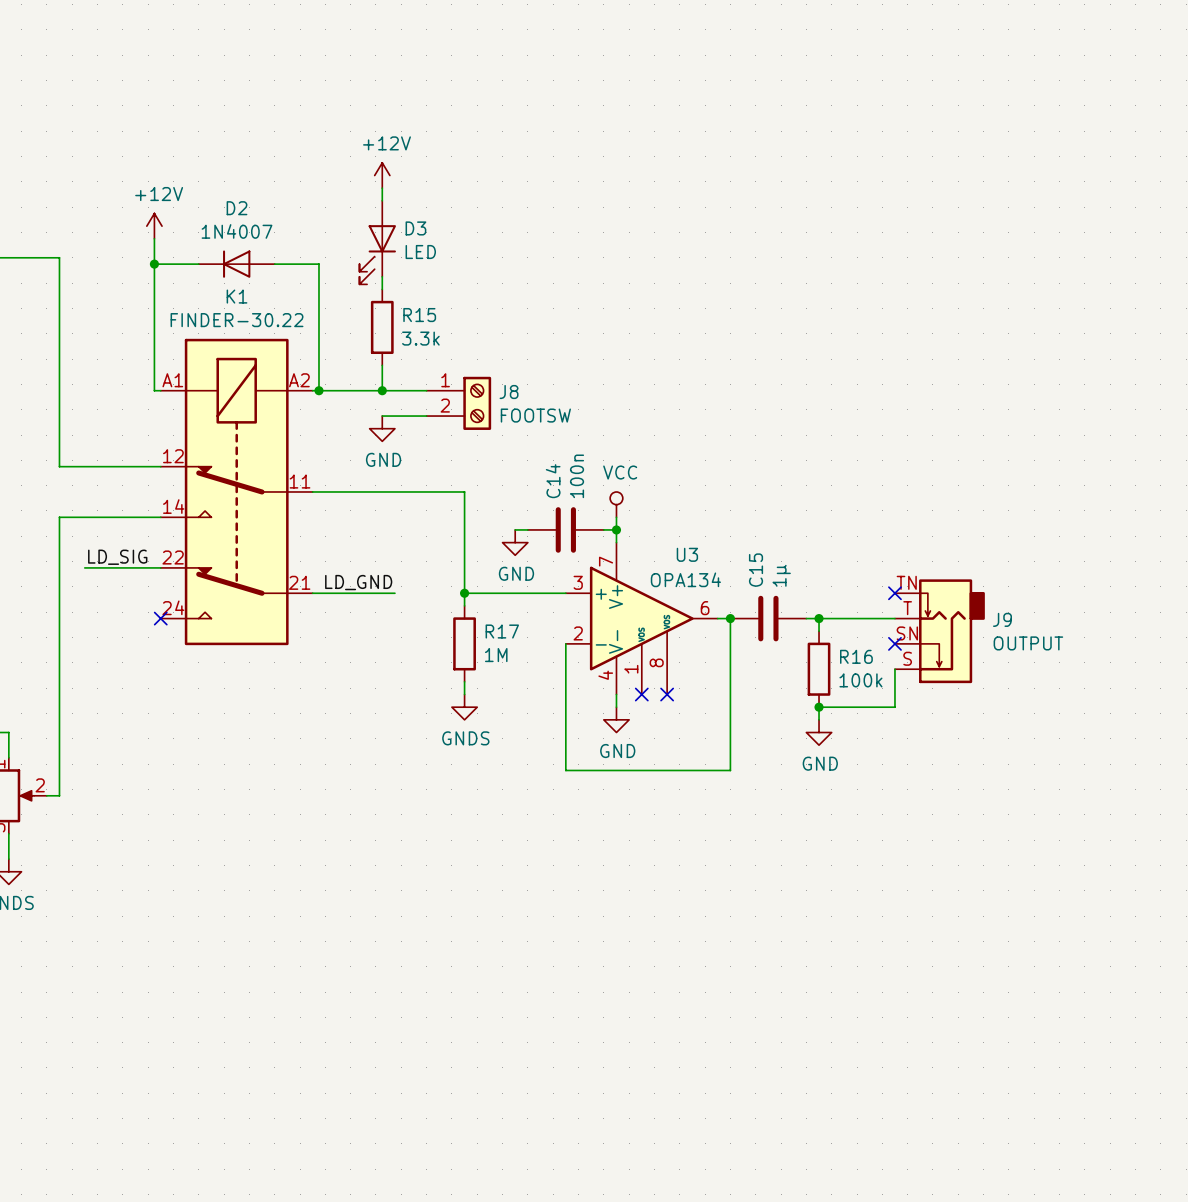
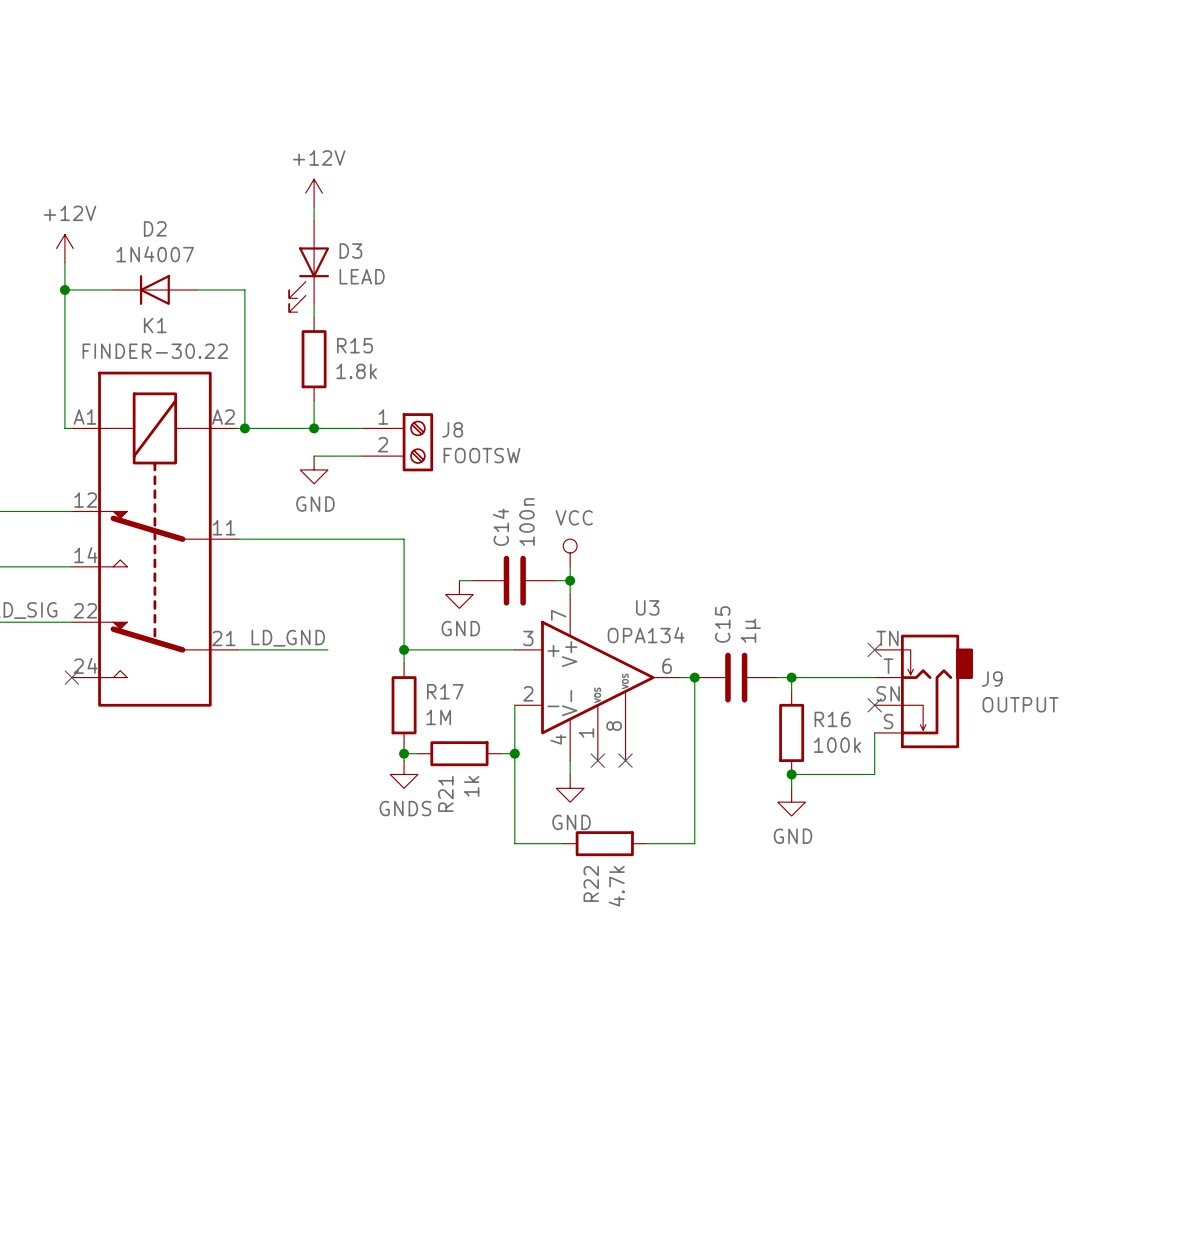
D3 value: LED (420, 252) -> LEAD (362, 276)
R15 value: 3.3k (420, 338) -> 1.8k (356, 371)
wire: none -> (404, 753) (417, 753)
junction: none -> (404, 753)
R21: none -> 1k (459, 753)
wire: none -> (500, 753) (514, 753)
junction: none -> (514, 753)
wire: (610, 770) (686, 770) -> none
R22: none -> 4.7k (604, 843)

